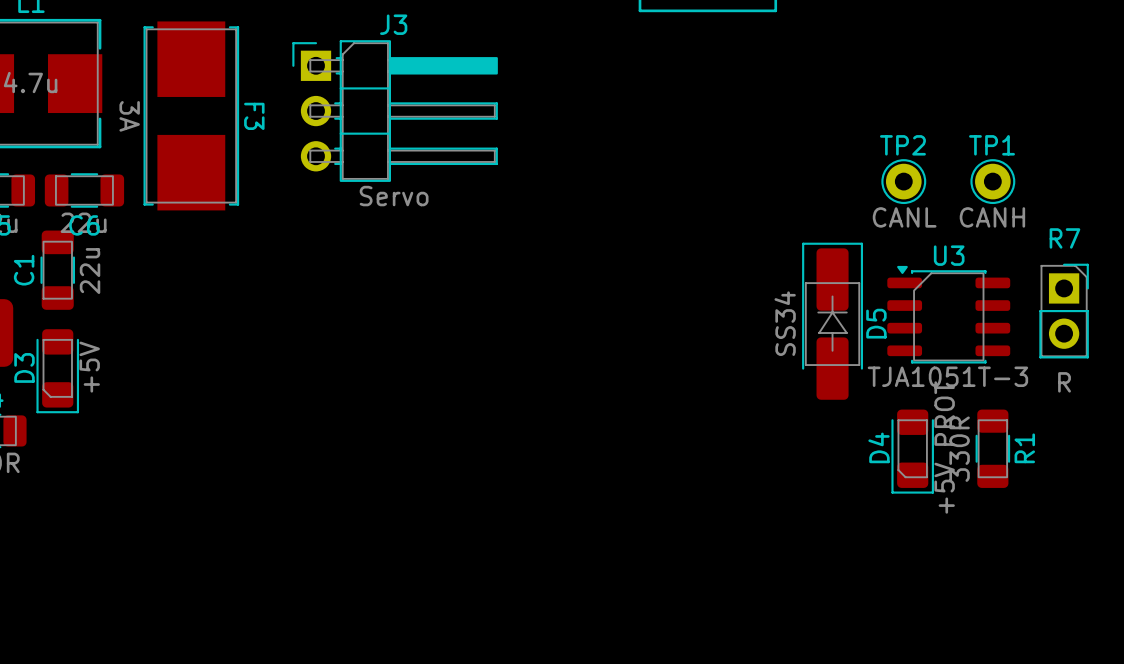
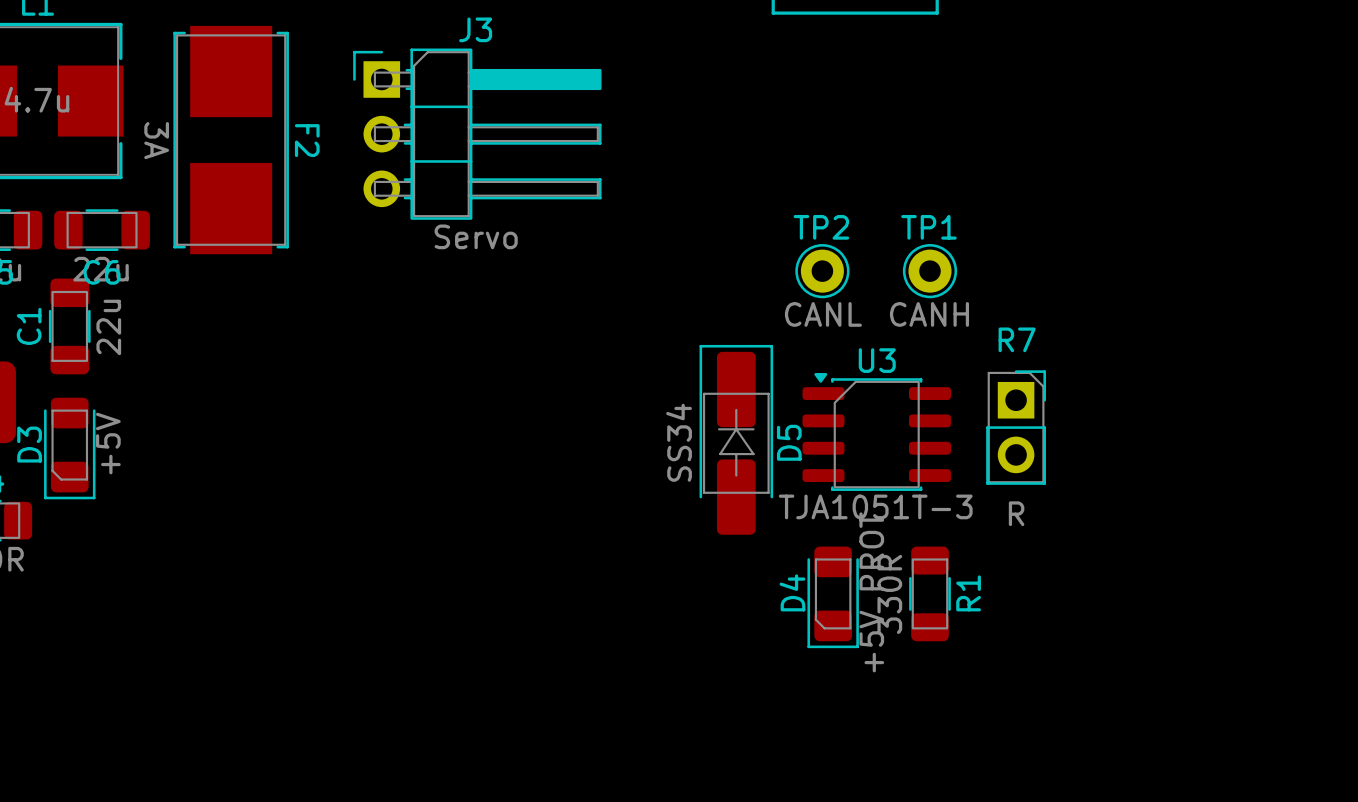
F3 name: F3 (254, 116) -> F2 (307, 140)
TP2 position: (903, 181) -> (822, 271)
TP1 position: (992, 181) -> (929, 271)
R7 position: (1064, 311) -> (1016, 427)
U3 position: (948, 314) -> (876, 431)
D5 position: (832, 321) -> (736, 439)
R1 position: (992, 448) -> (929, 593)
D4 position: (912, 451) -> (833, 597)

